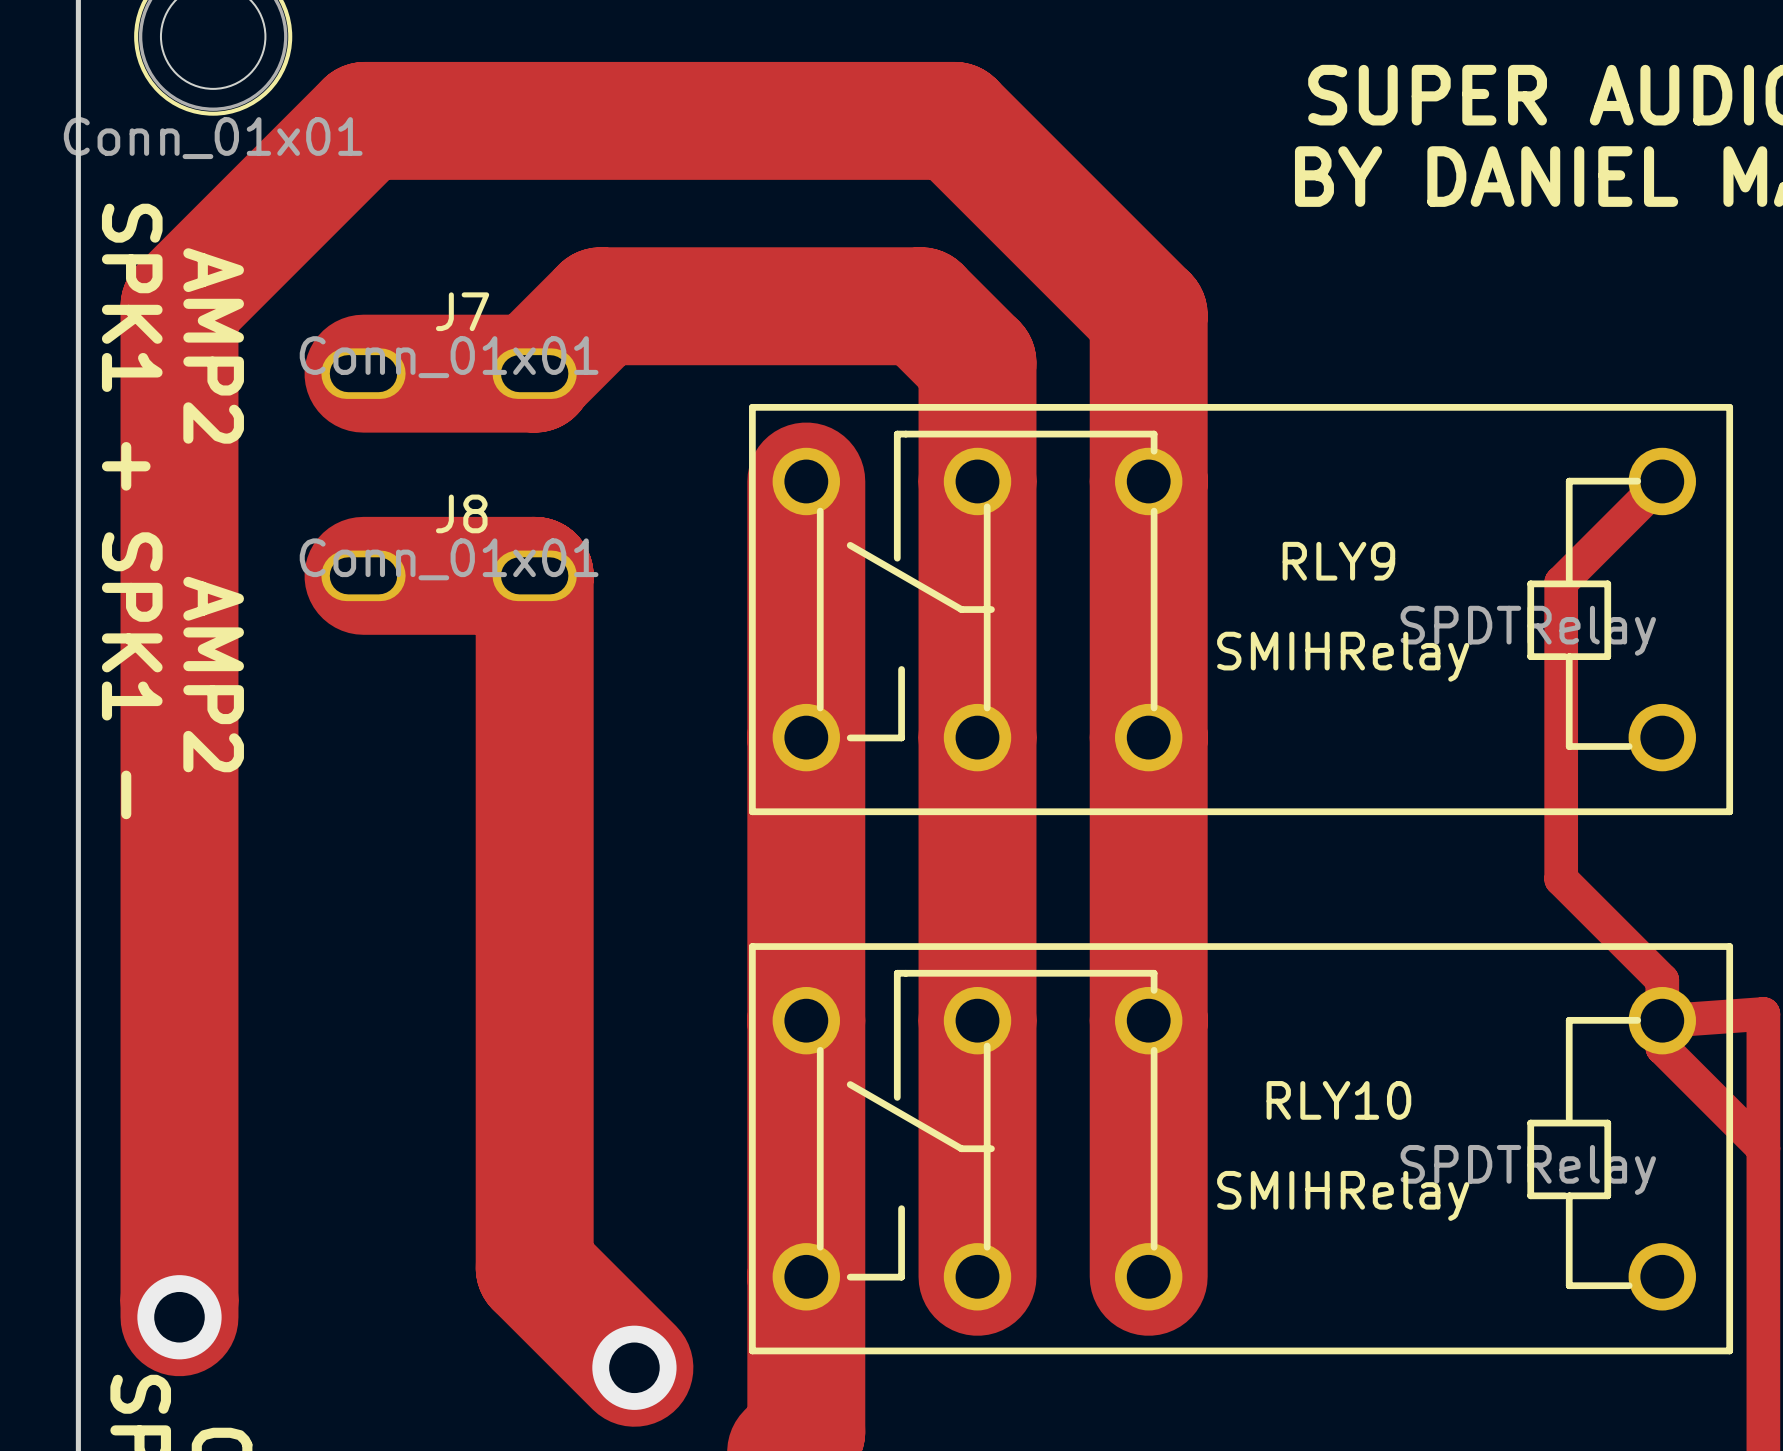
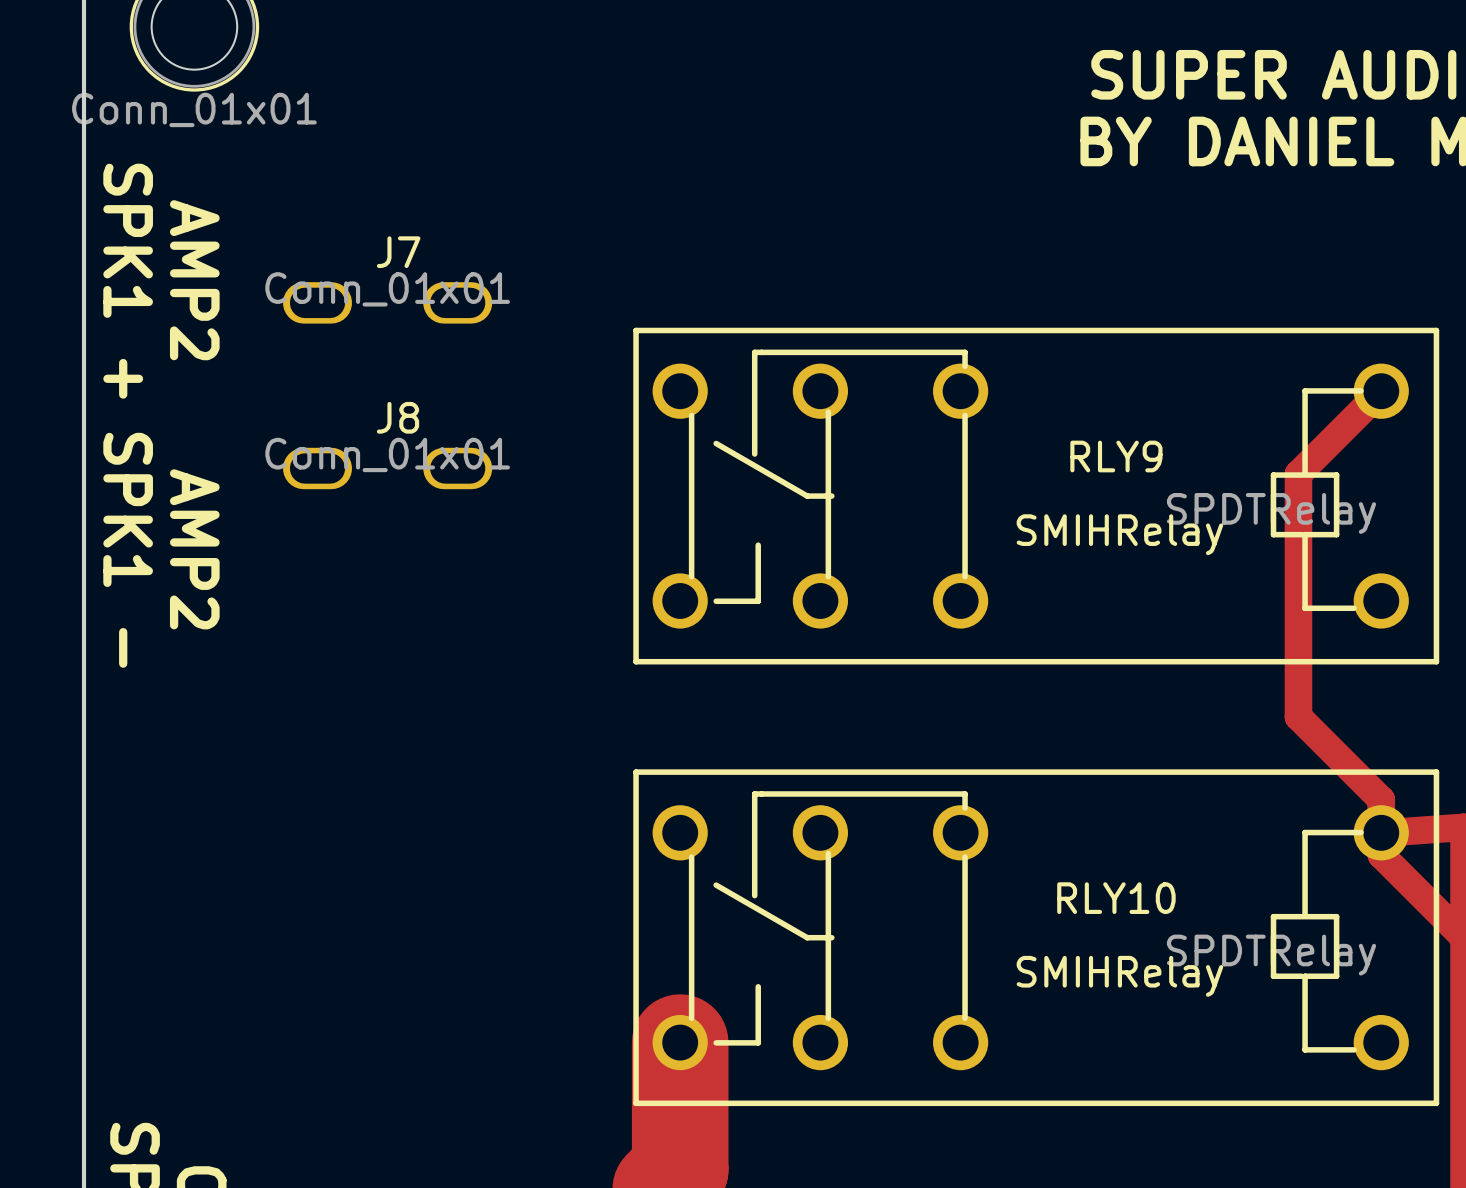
track: (363, 373) (534, 373) (600, 306) (920, 306) (977, 362) (977, 1276) -> none
track: (806, 481) (806, 1276) -> none
track: (363, 575) (534, 575) -> none
track: (534, 575) (534, 1268) (634, 1367) -> none
track: (1148, 1276) (1148, 315) (954, 120) (364, 120) (179, 306) (179, 1317) -> none
via: (179, 1317) -> none
via: (634, 1367) -> none

